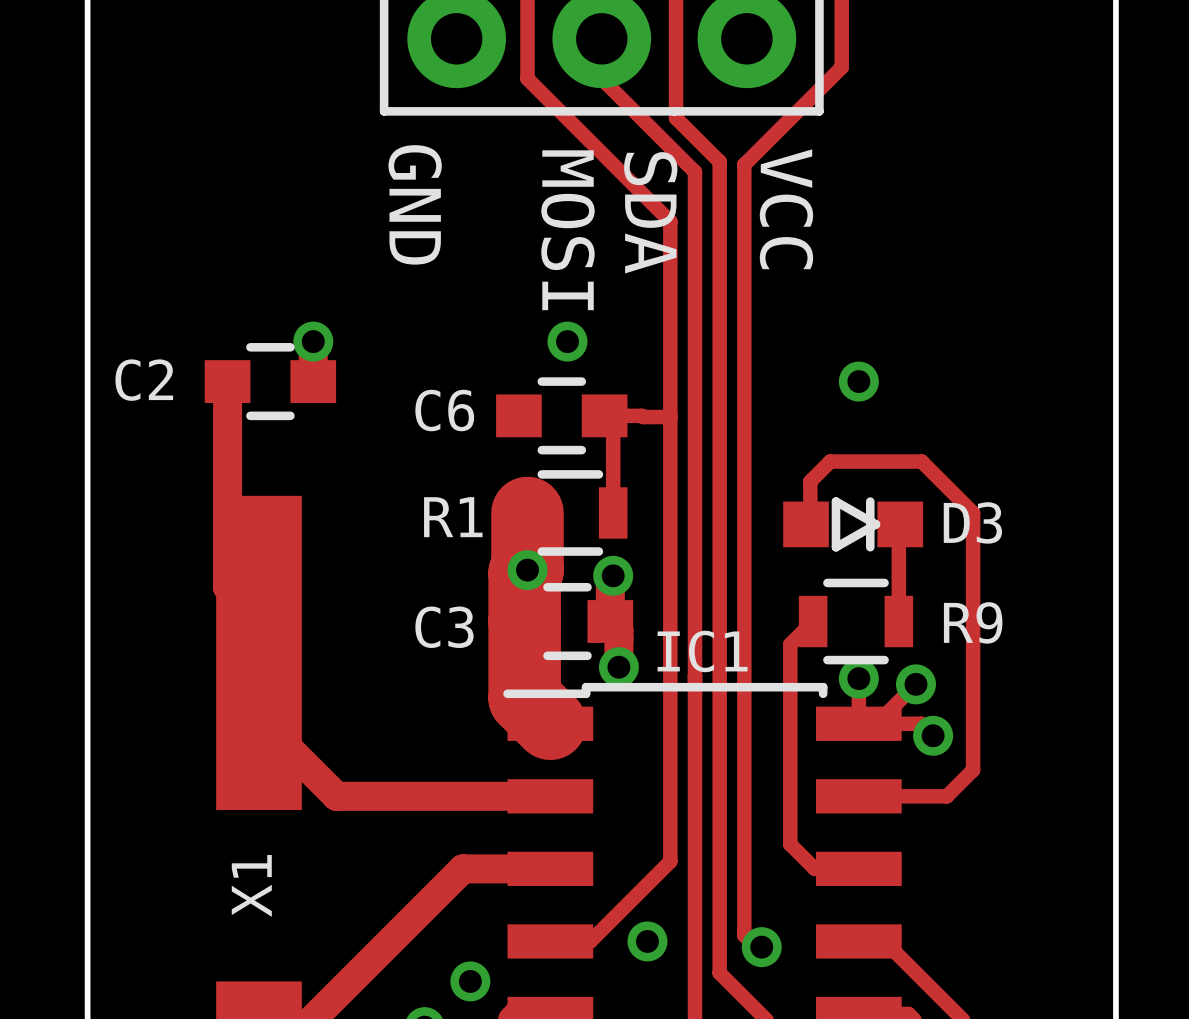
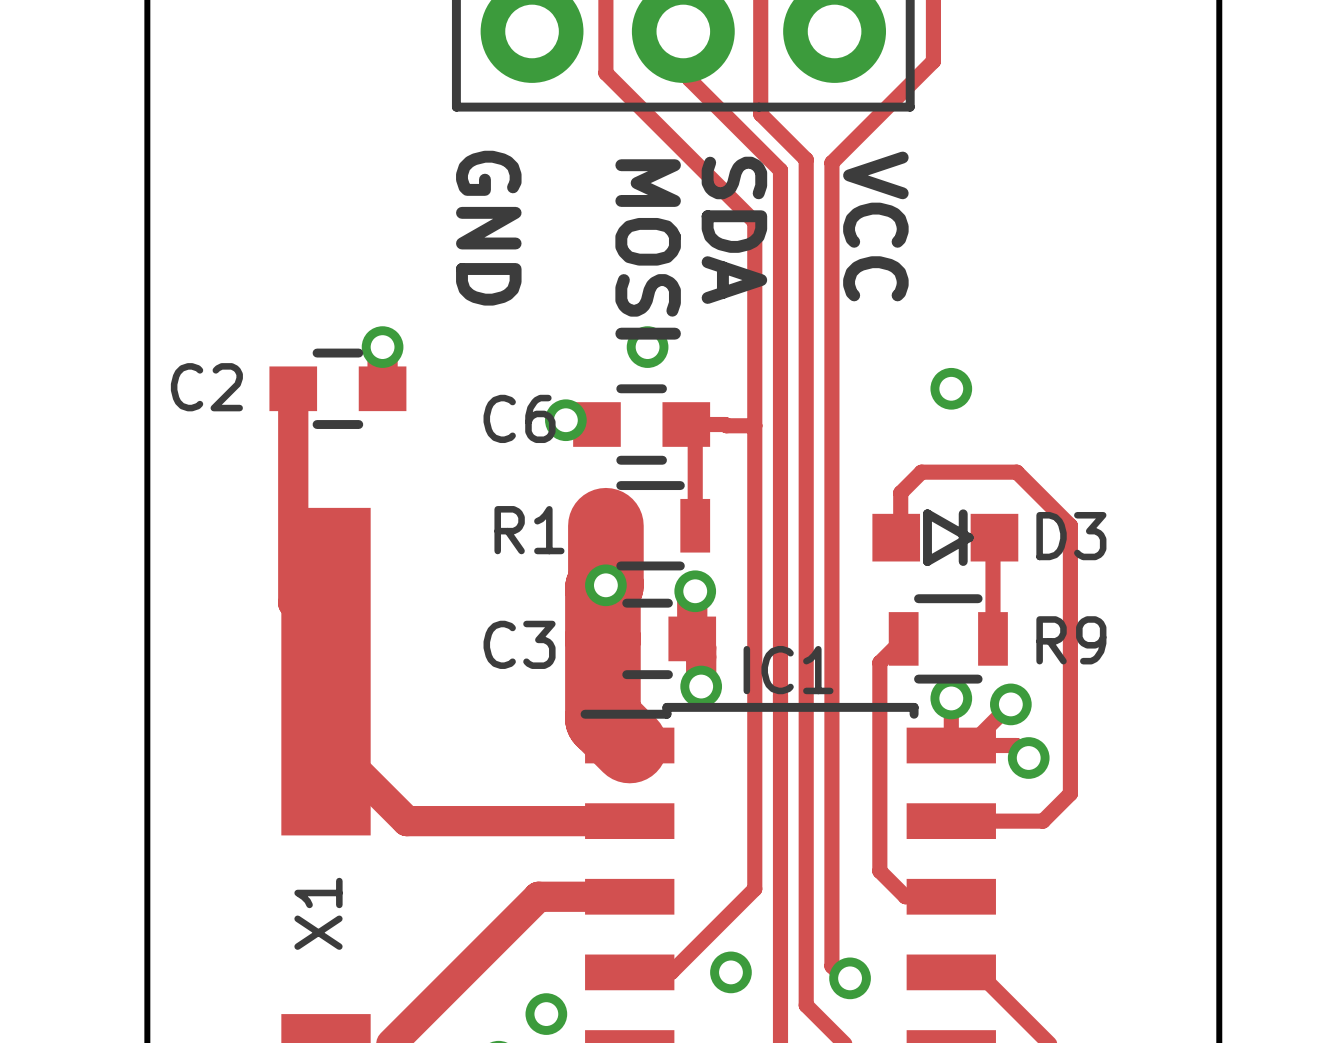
via: none -> (565, 420)

